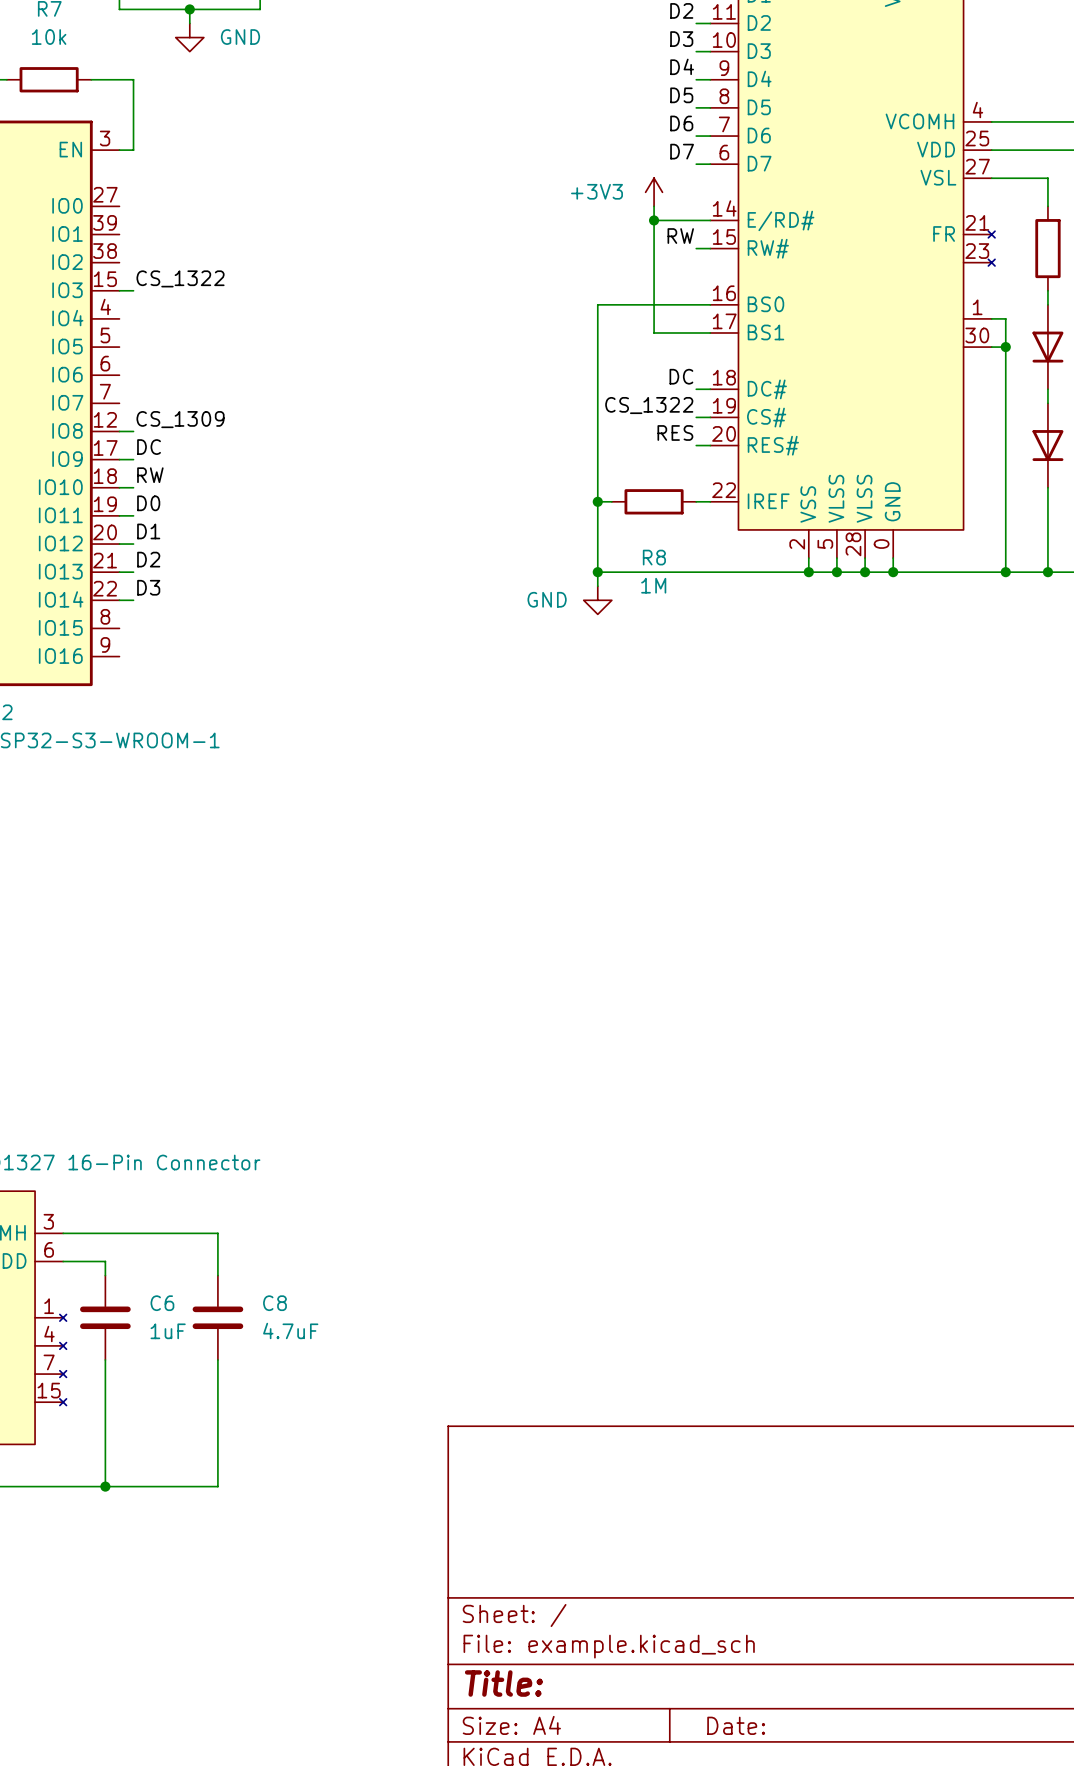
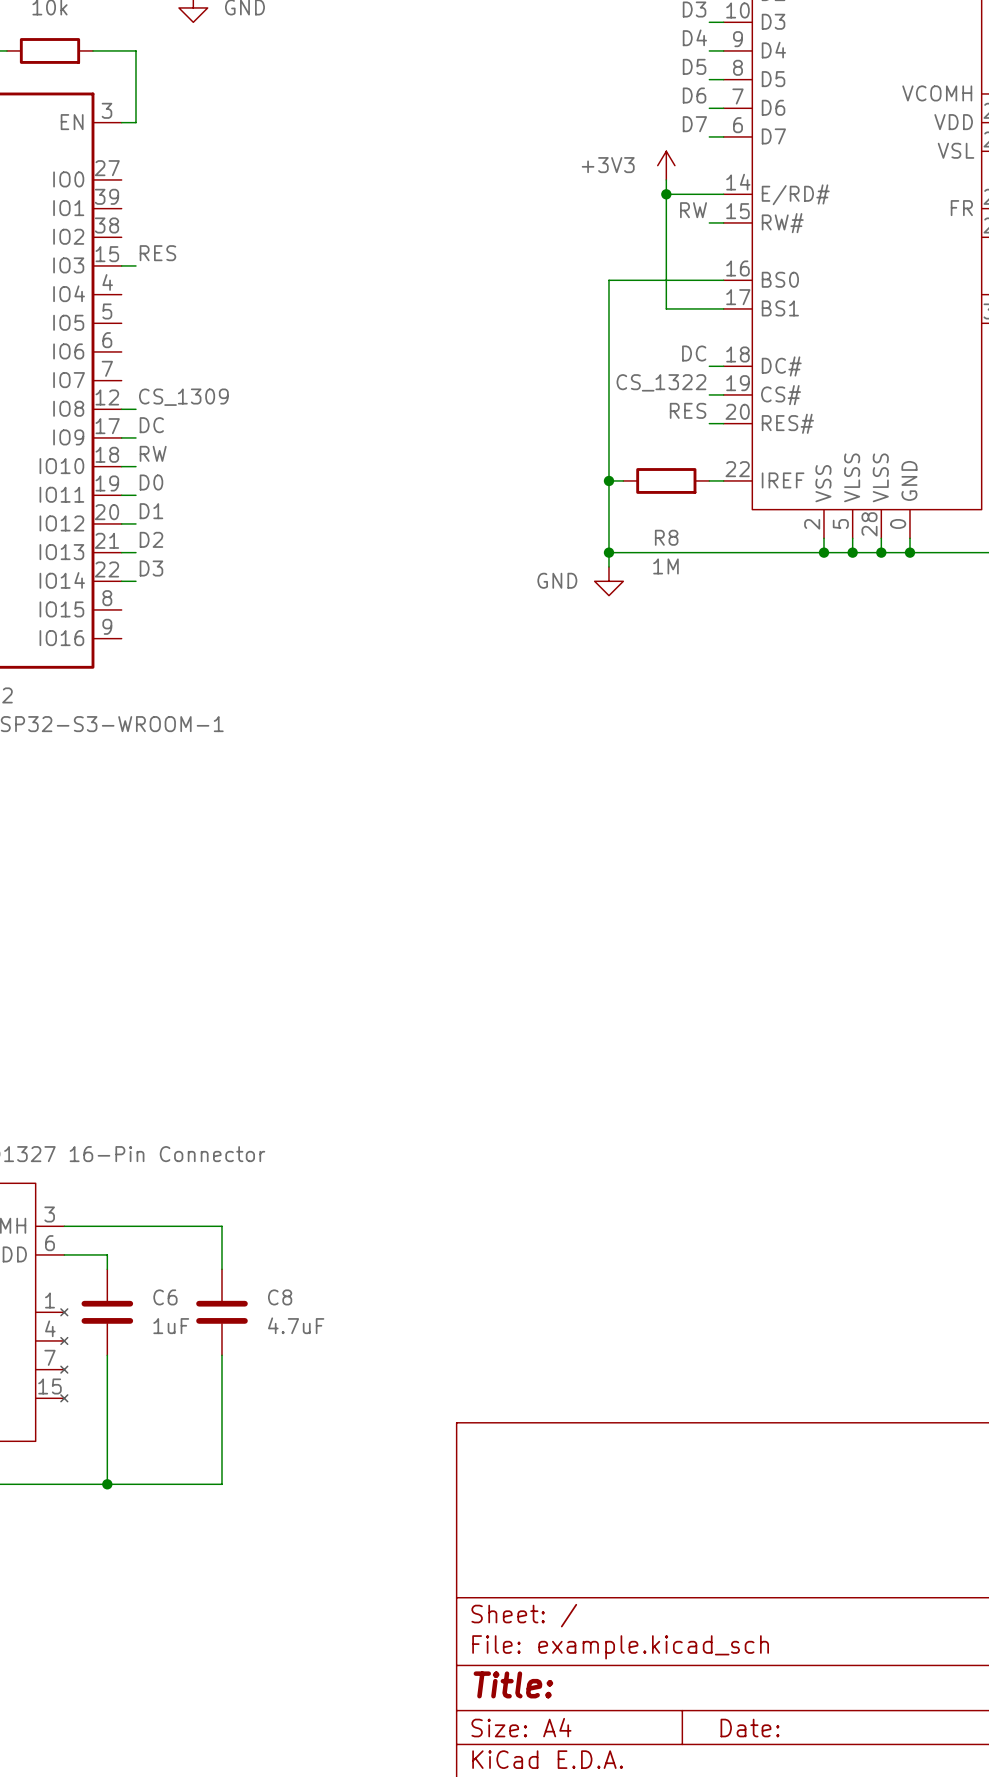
label: CS_1322 (180, 278) -> RES (157, 253)

